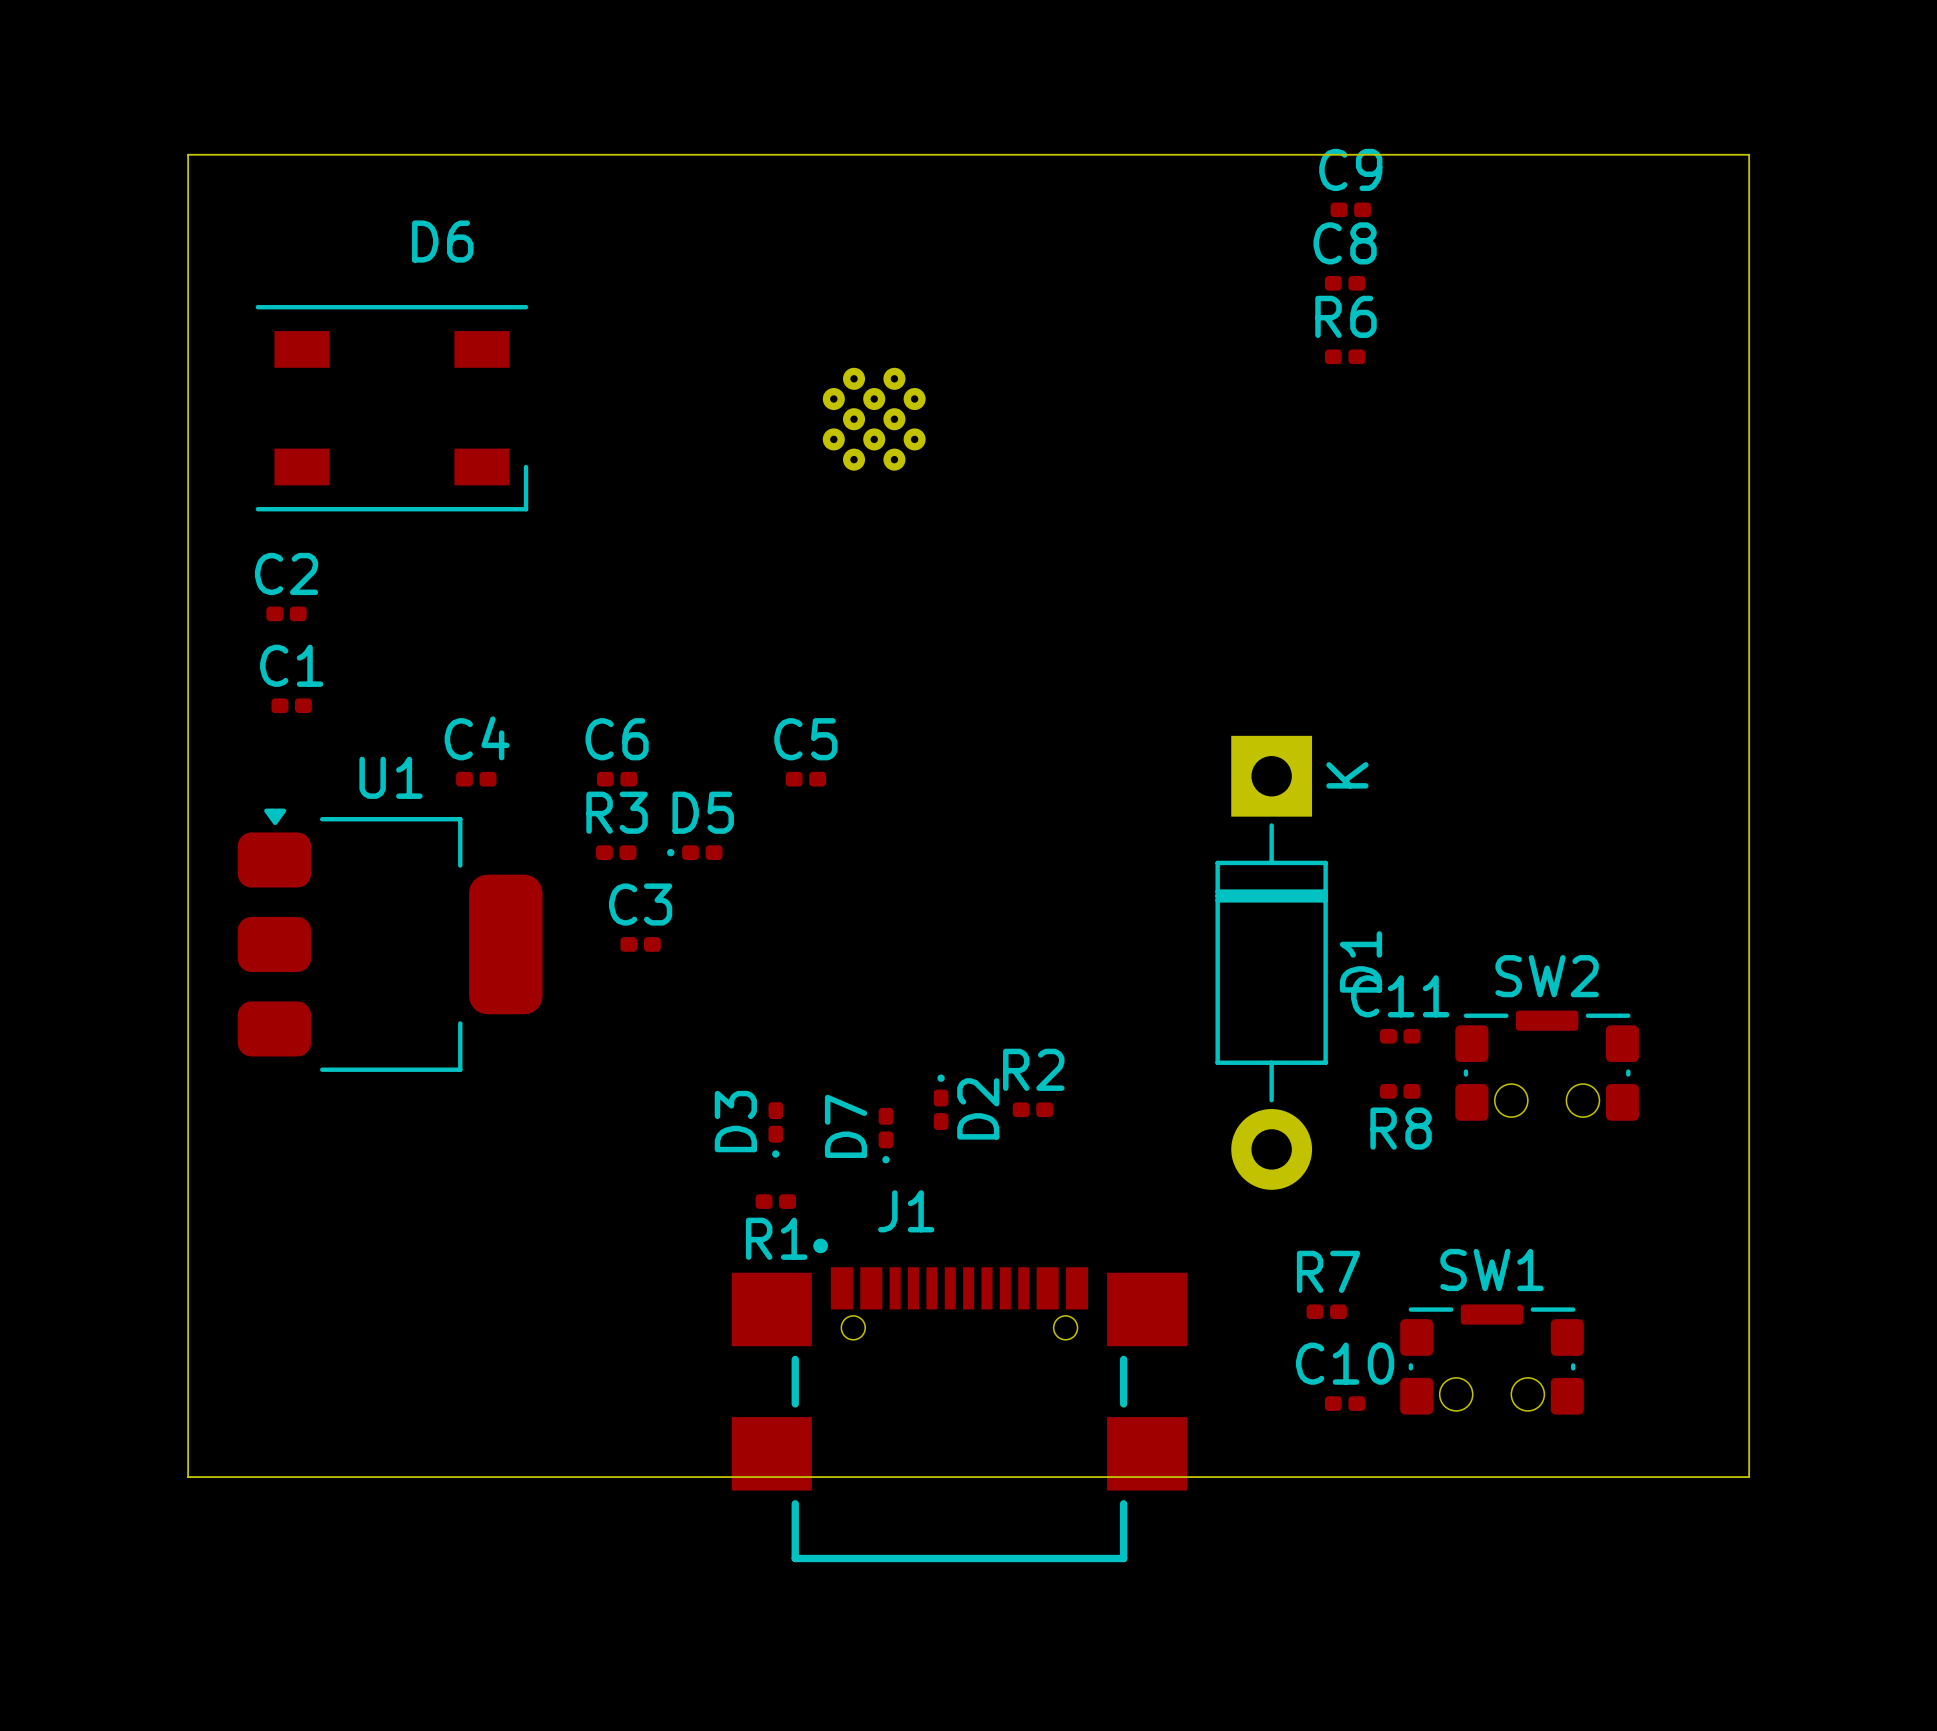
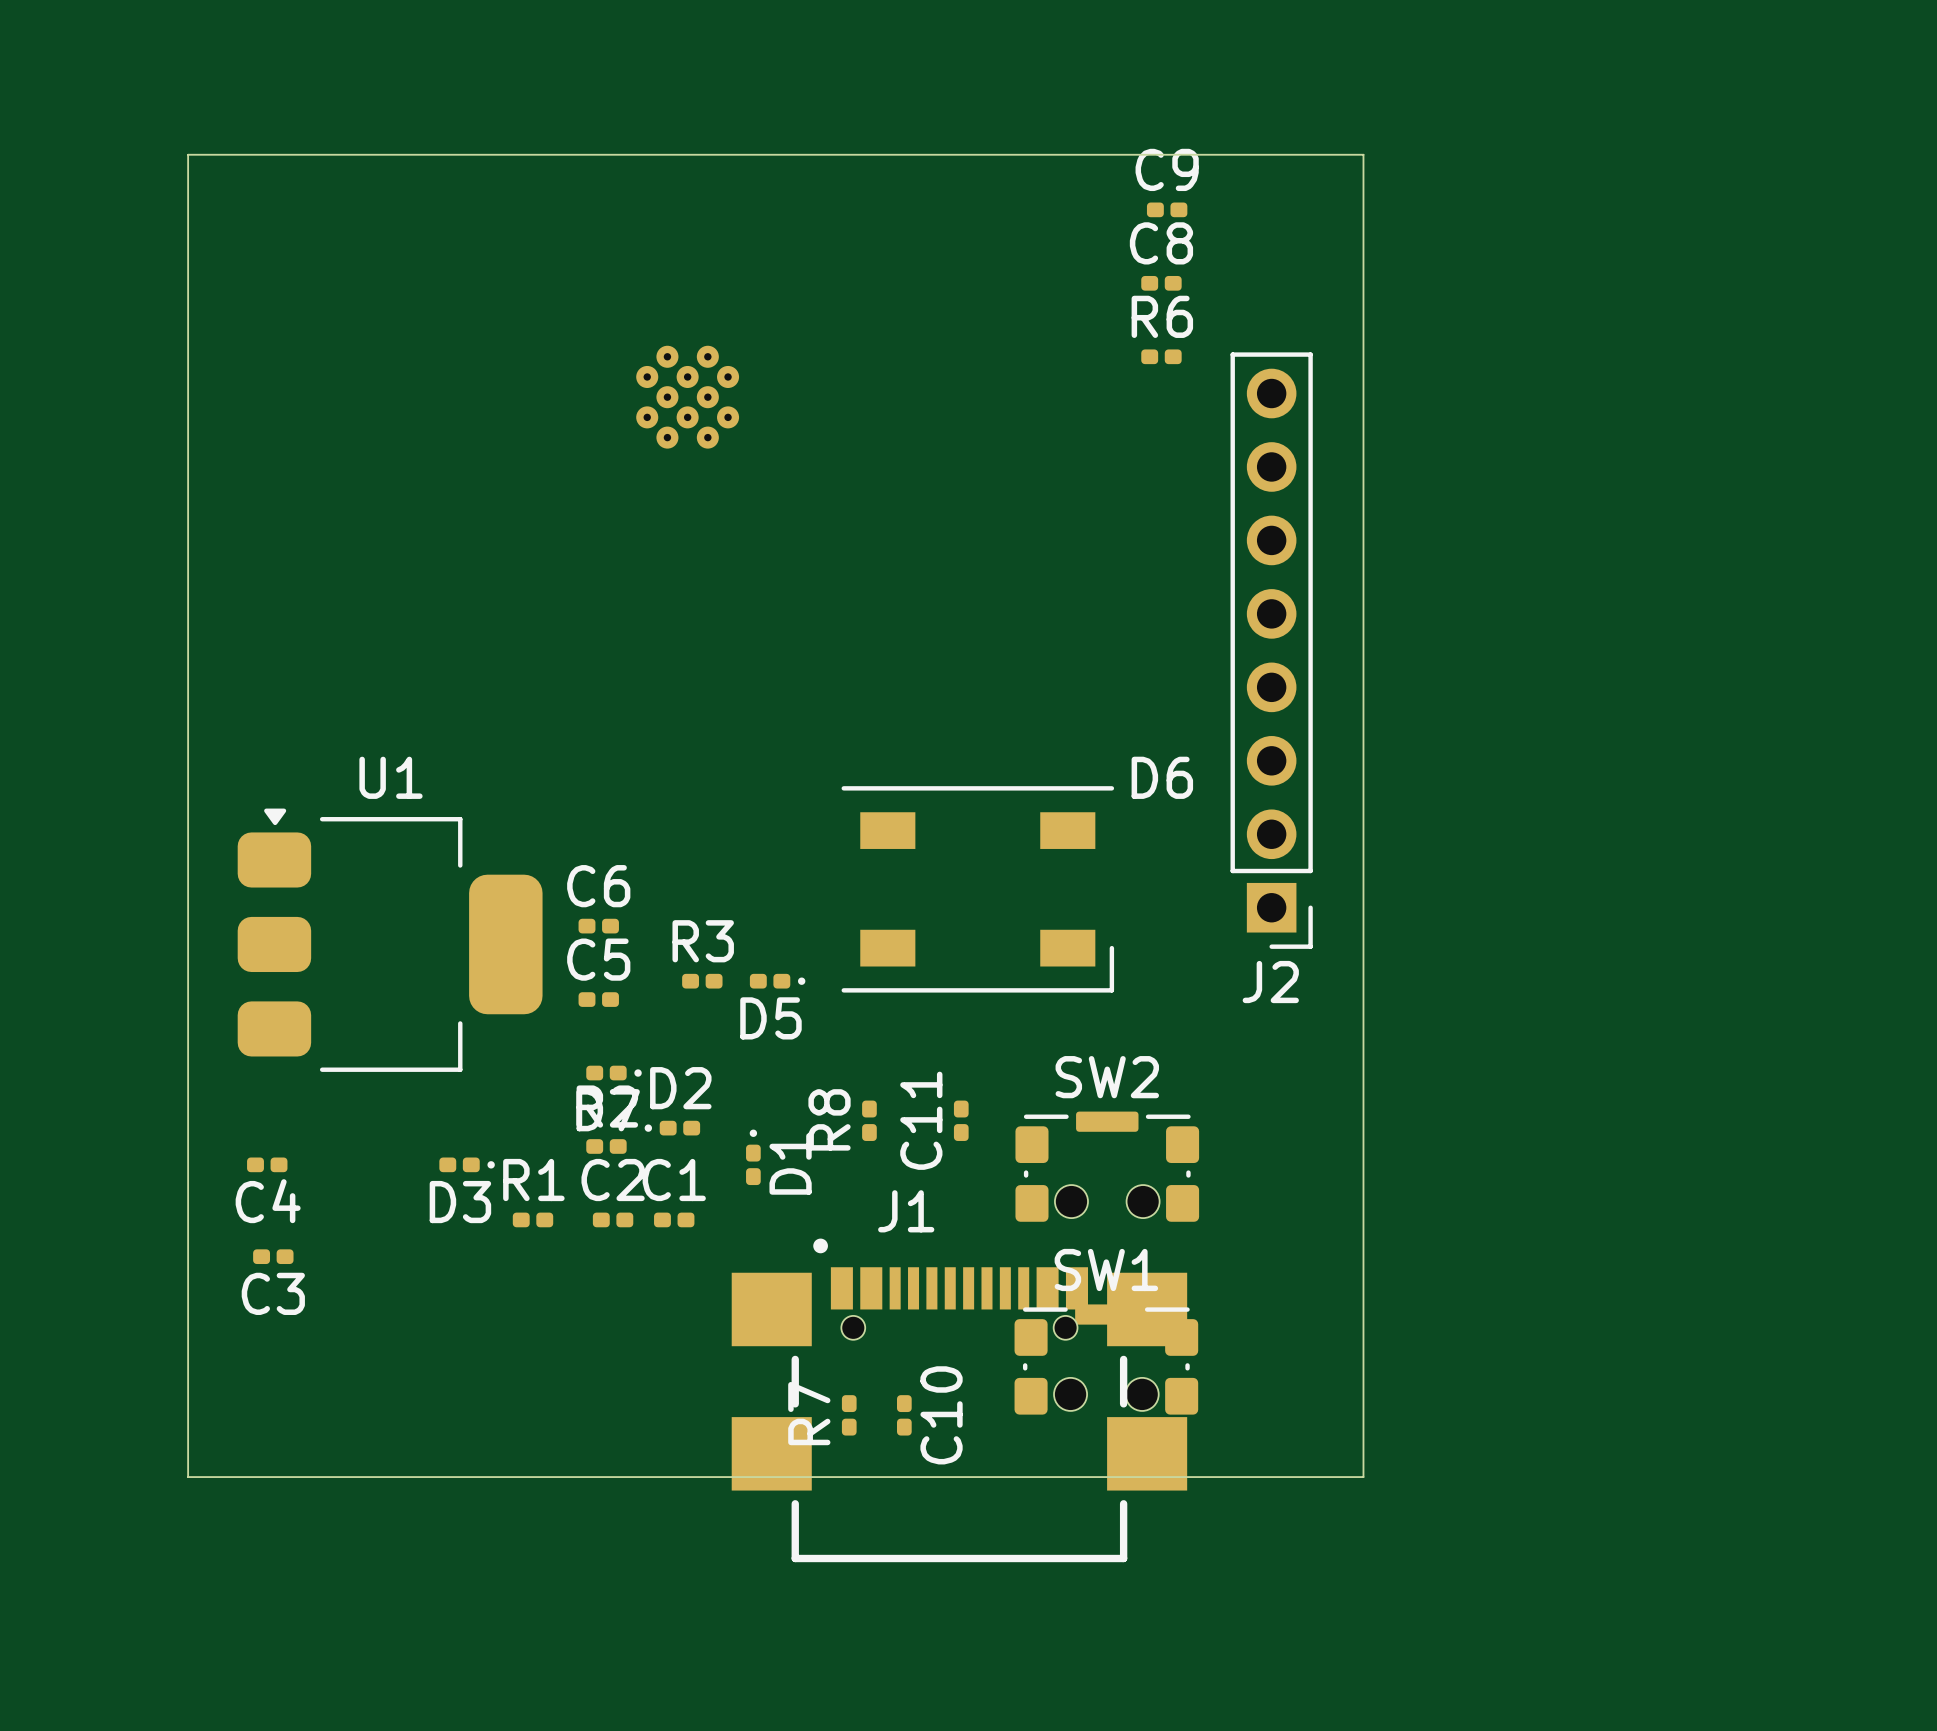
board edge: (1363, 154) (1749, 154) (1749, 1477) (1363, 1477) -> (1363, 154) (1363, 1477)
C9 position: (1350, 209) -> (1167, 209)
D6 name position: D6 (442, 241) -> D6 (1162, 777)
C8 position: (1345, 283) -> (1161, 283)
R6 position: (1345, 356) -> (1161, 356)
D6 position: (391, 408) -> (977, 889)
part position: (874, 419) -> (687, 397)
C2 position: (286, 613) -> (613, 1219)
J2: none -> (1271, 650)
C1 position: (291, 705) -> (674, 1219)
D1 footprint: [1215, 735, 1328, 1190] -> [746, 1129, 761, 1186]
C4 name position: C4 (477, 738) -> C4 (268, 1201)
C4 position: (476, 779) -> (267, 1164)
C6 position: (617, 779) -> (598, 926)
C5 position: (805, 779) -> (598, 999)
R3 position: (616, 852) -> (702, 981)
D5 rotation: 0° (694, 852) -> 180° (777, 981)
D5 position: (694, 852) -> (777, 981)
C3 name position: C3 (640, 904) -> C3 (273, 1293)
C3 position: (640, 944) -> (273, 1256)
C11 rotation: 0° (1400, 1036) -> 90° clockwise (961, 1120)
C11 position: (1400, 1036) -> (961, 1120)
SW2 position: (1547, 1065) -> (1107, 1166)
R8 rotation: 0° (1400, 1091) -> 90° clockwise (869, 1120)
R8 position: (1400, 1091) -> (869, 1120)
D2 rotation: 0° (941, 1102) -> 90° counterclockwise (672, 1128)
D2 position: (941, 1102) -> (672, 1128)
R2 position: (1032, 1109) -> (606, 1146)
D3 rotation: 0° (775, 1129) -> 90° counterclockwise (467, 1164)
D3 position: (775, 1129) -> (467, 1164)
D7 rotation: 0° (885, 1135) -> 90° counterclockwise (613, 1073)
D7 position: (885, 1135) -> (613, 1073)
R1 position: (775, 1201) -> (533, 1219)
R1 name position: R1 (776, 1238) -> R1 (533, 1180)
R7 rotation: 0° (1326, 1311) -> 90° clockwise (849, 1415)
R7 position: (1326, 1311) -> (849, 1415)
SW1 position: (1492, 1359) -> (1106, 1359)
C10 rotation: 0° (1345, 1403) -> 90° clockwise (904, 1415)
C10 position: (1345, 1403) -> (904, 1415)

